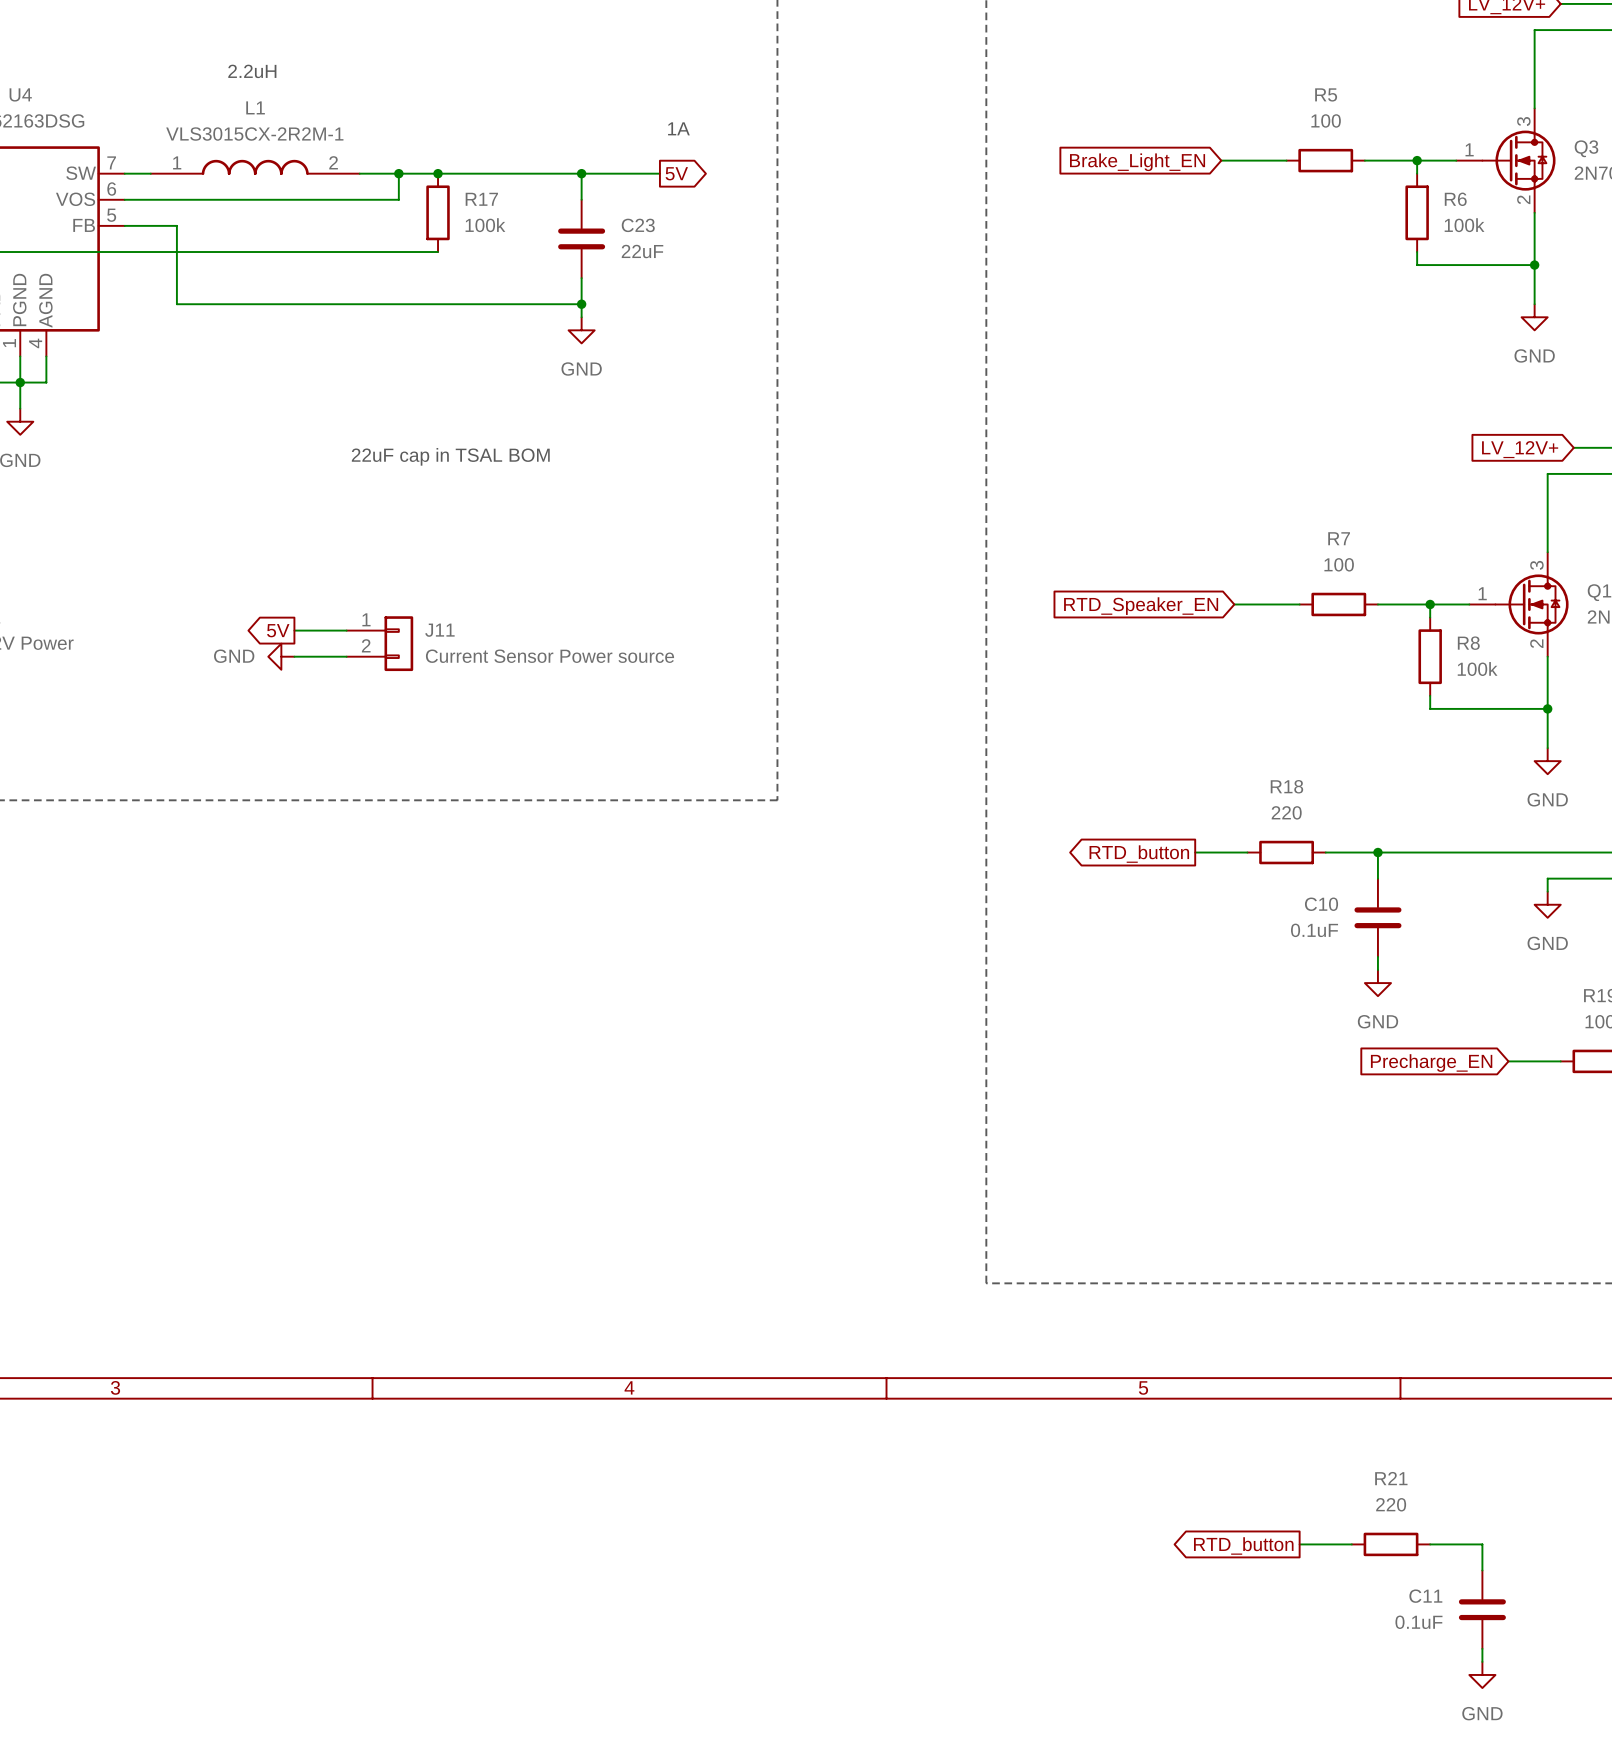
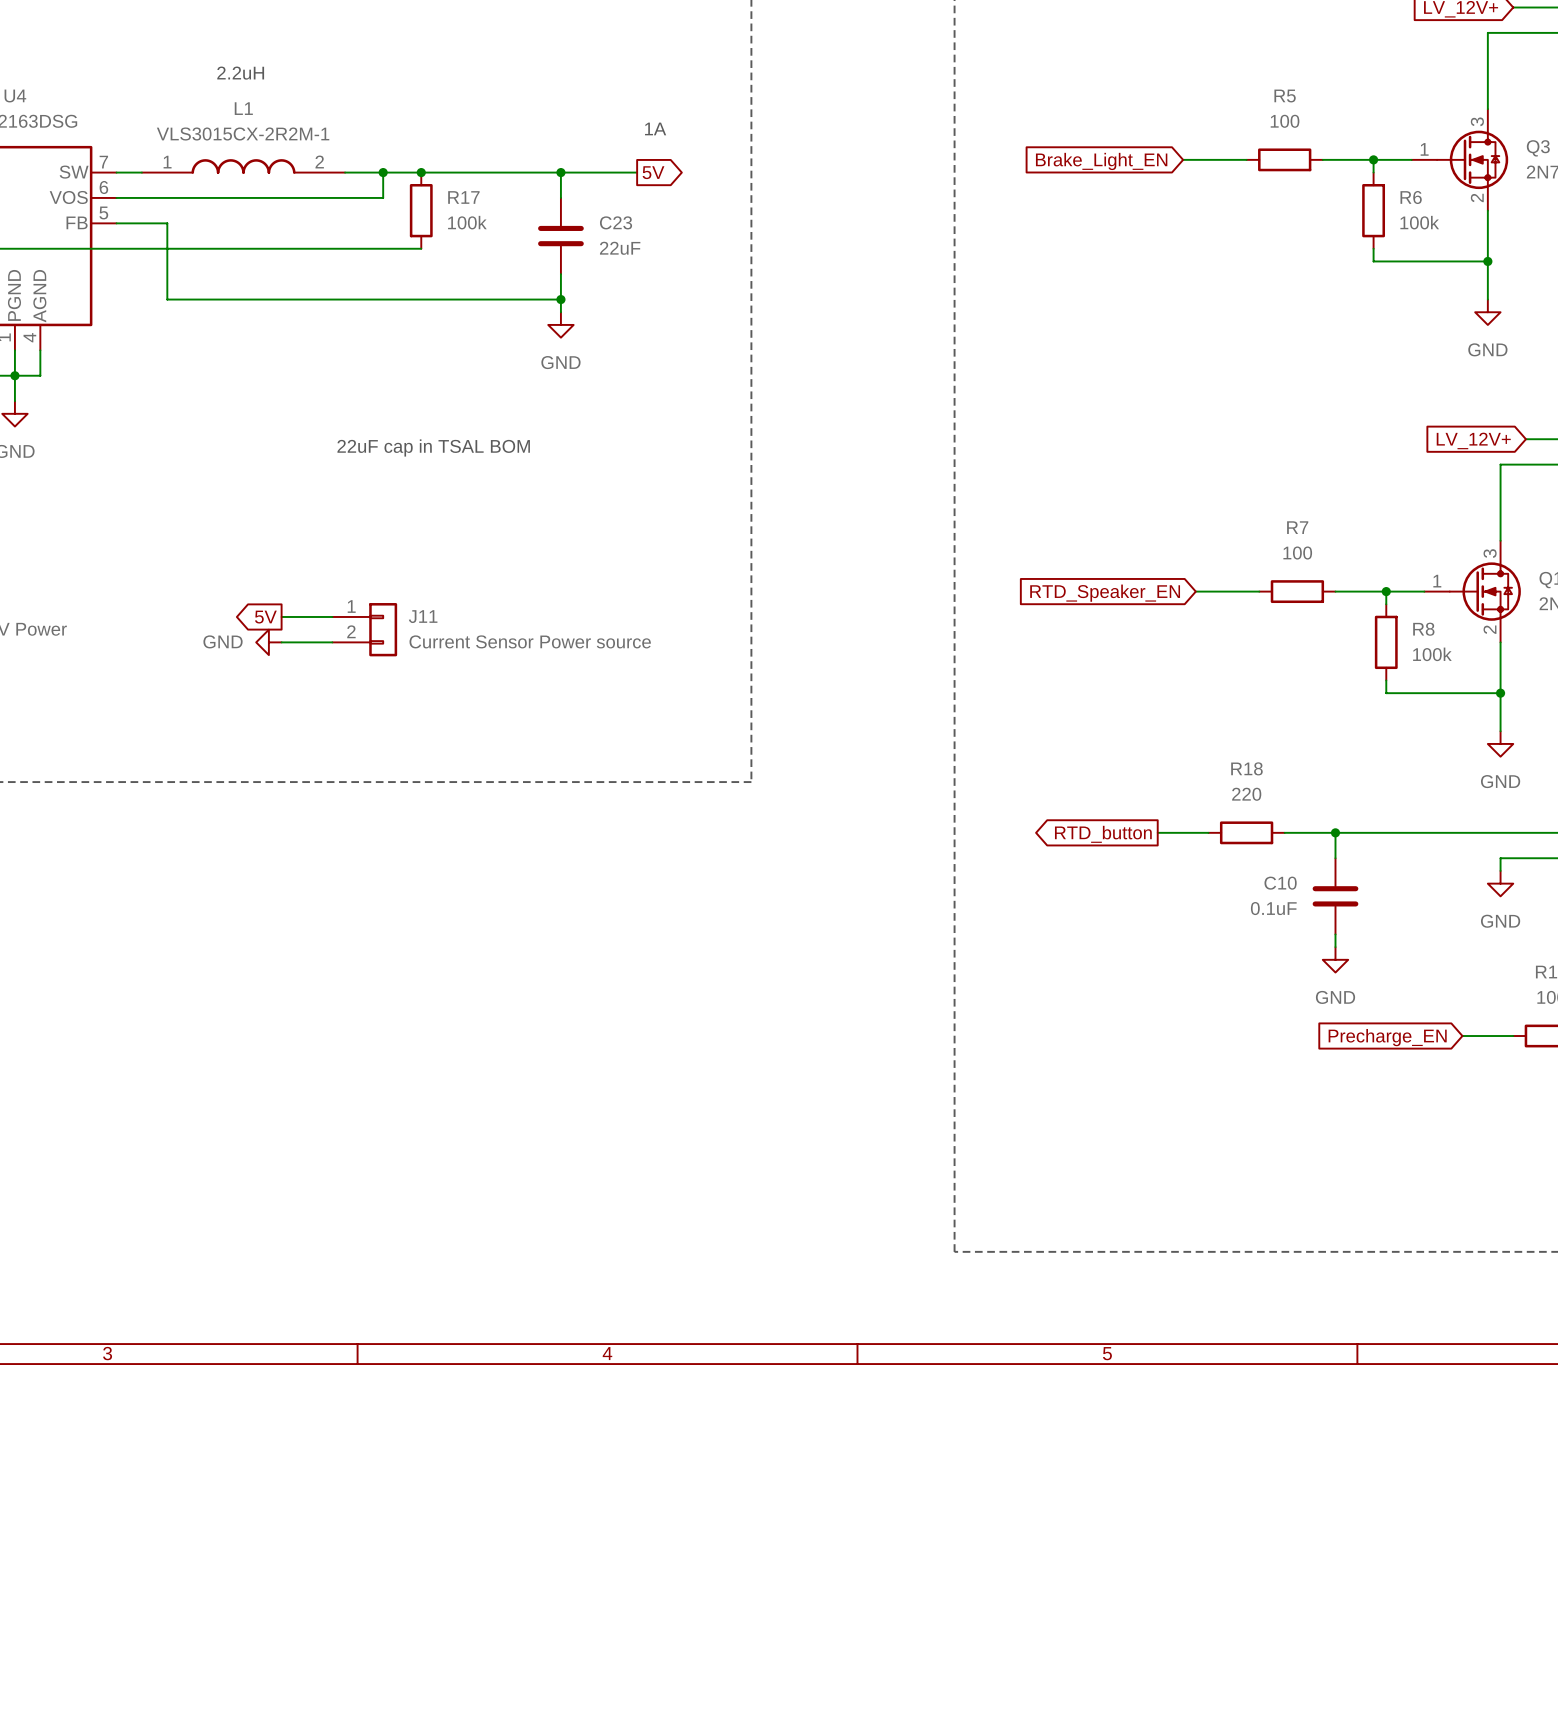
wire: (1299, 1544) (1351, 1544) -> none
R21: 220 (1391, 1544) -> none
wire: (1430, 1544) (1482, 1544) (1482, 1570) -> none
global label: RTD_button (1243, 1545) -> none
C11: 0.1uF (1482, 1609) -> none
wire: (1482, 1648) (1482, 1661) -> none
power symbol: GND (1482, 1674) -> none

